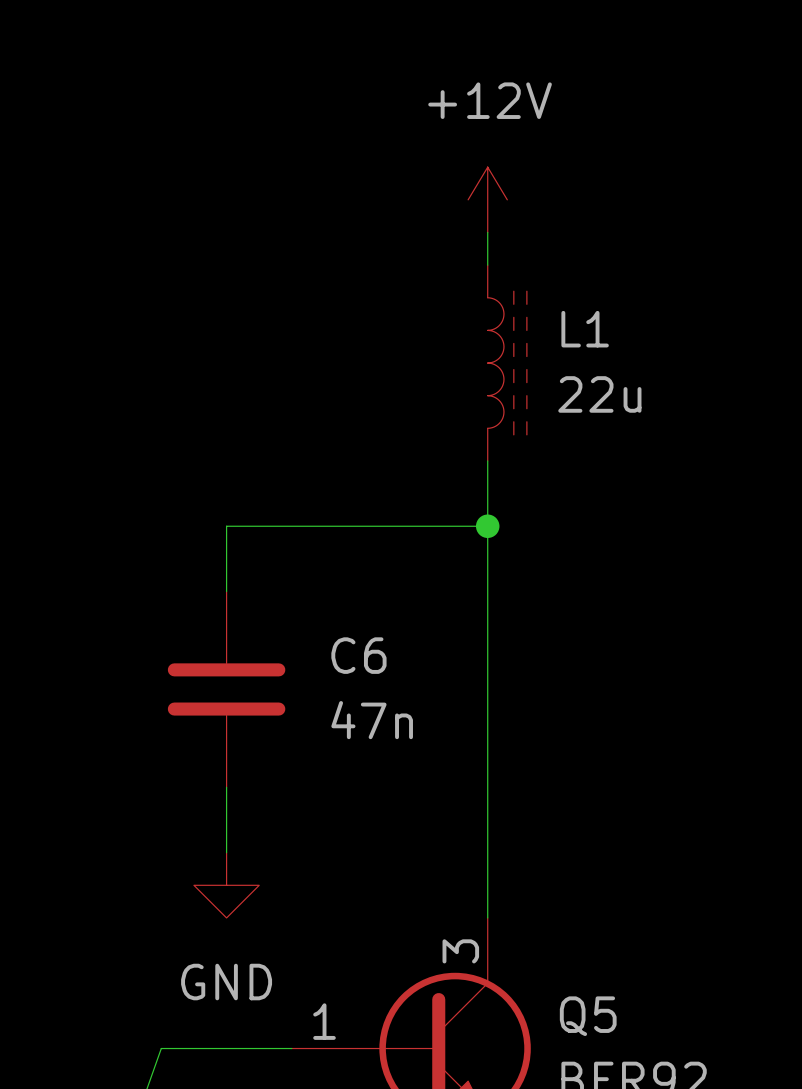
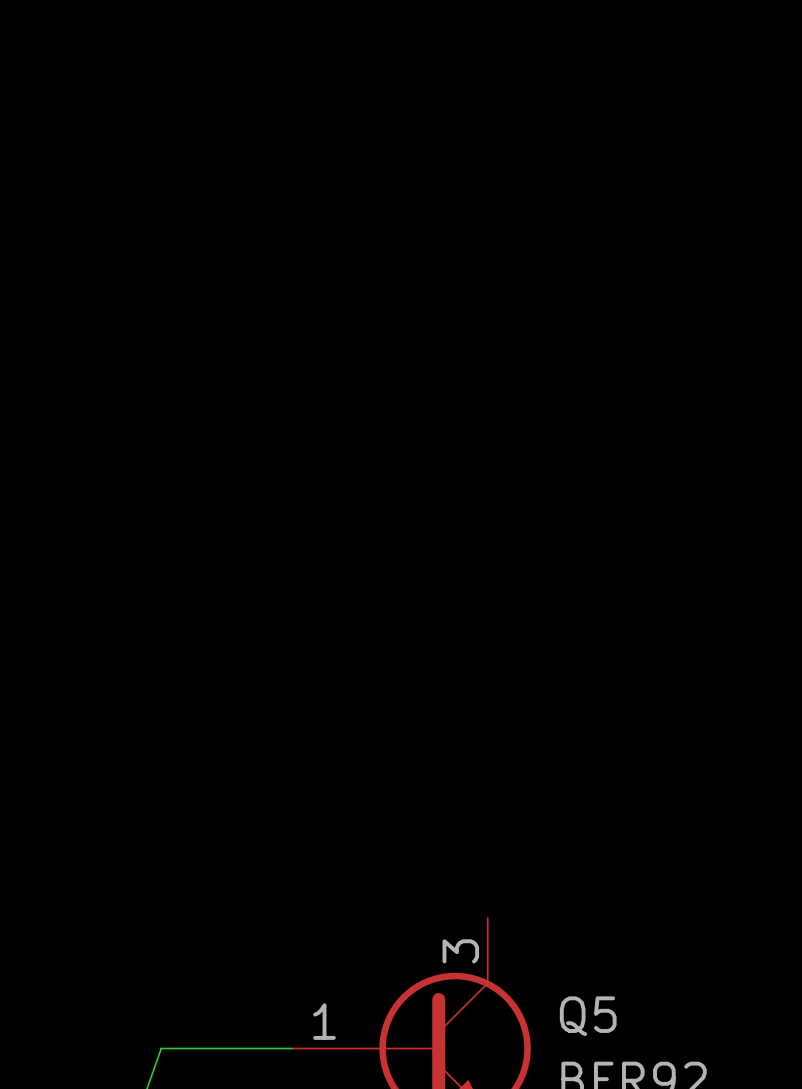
power symbol: +12V (487, 199) -> none
wire: (487, 232) (487, 265) -> none
L1: 22u (507, 363) -> none
wire: (487, 460) (487, 917) -> none
wire: (487, 526) (226, 526) (226, 591) -> none
junction: (487, 526) -> none
C6: 47n (226, 689) -> none
wire: (226, 787) (226, 852) -> none
power symbol: GND (226, 885) -> none

